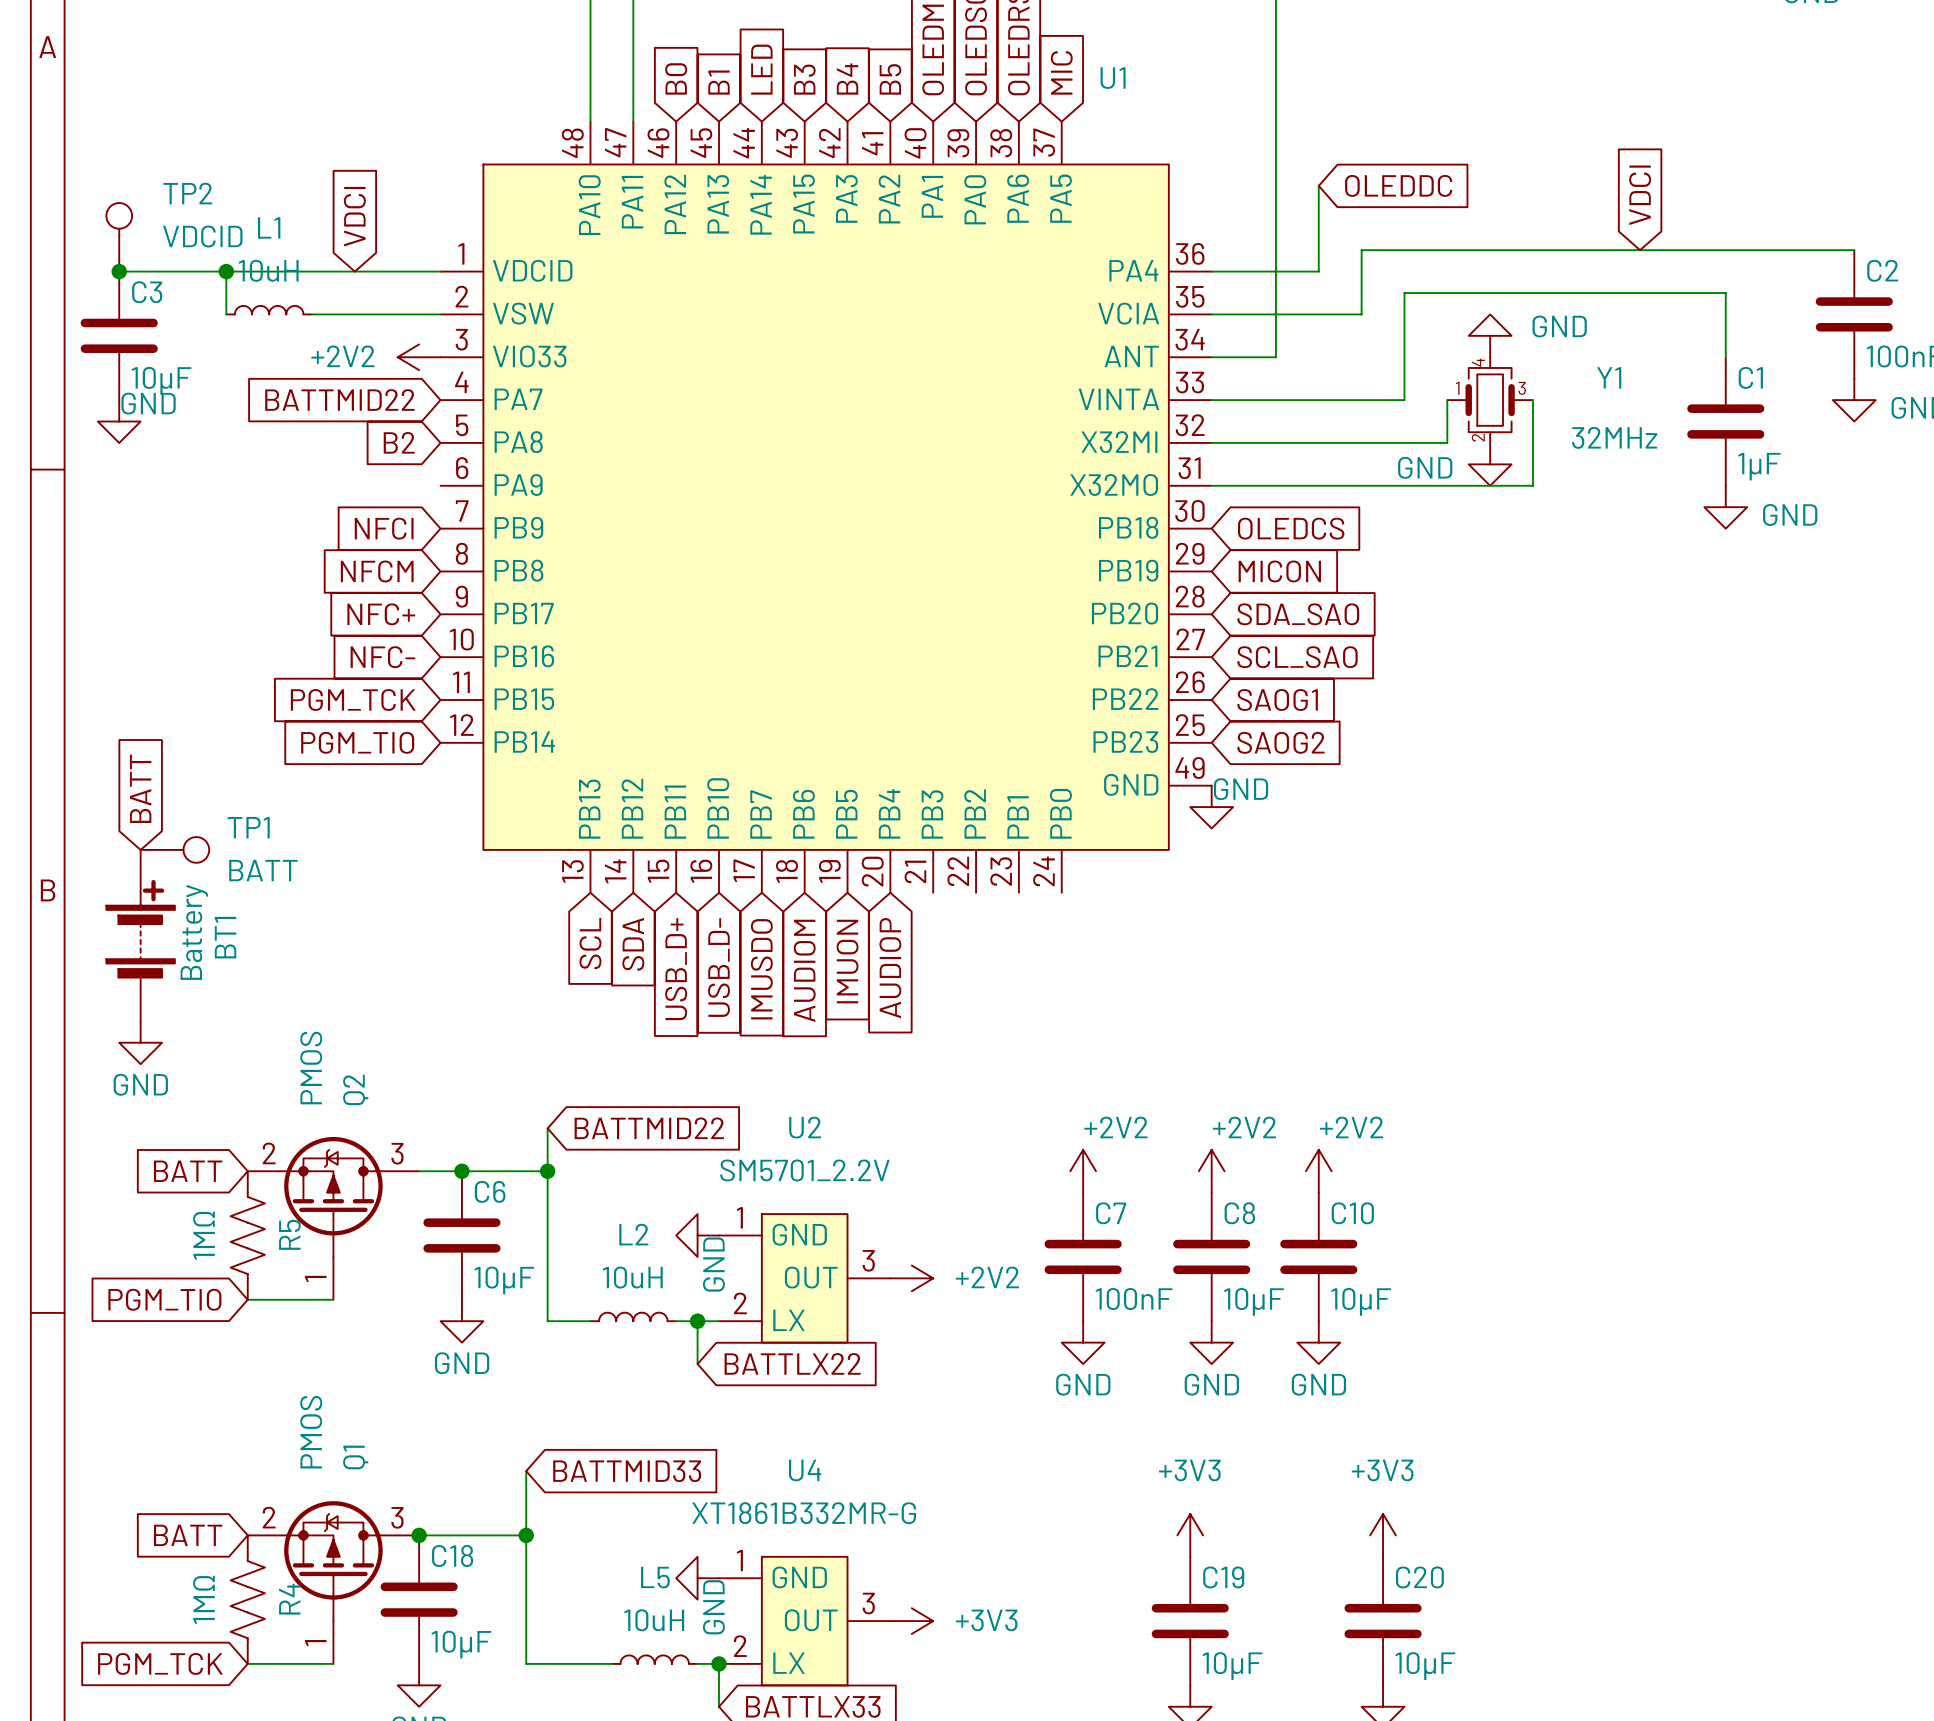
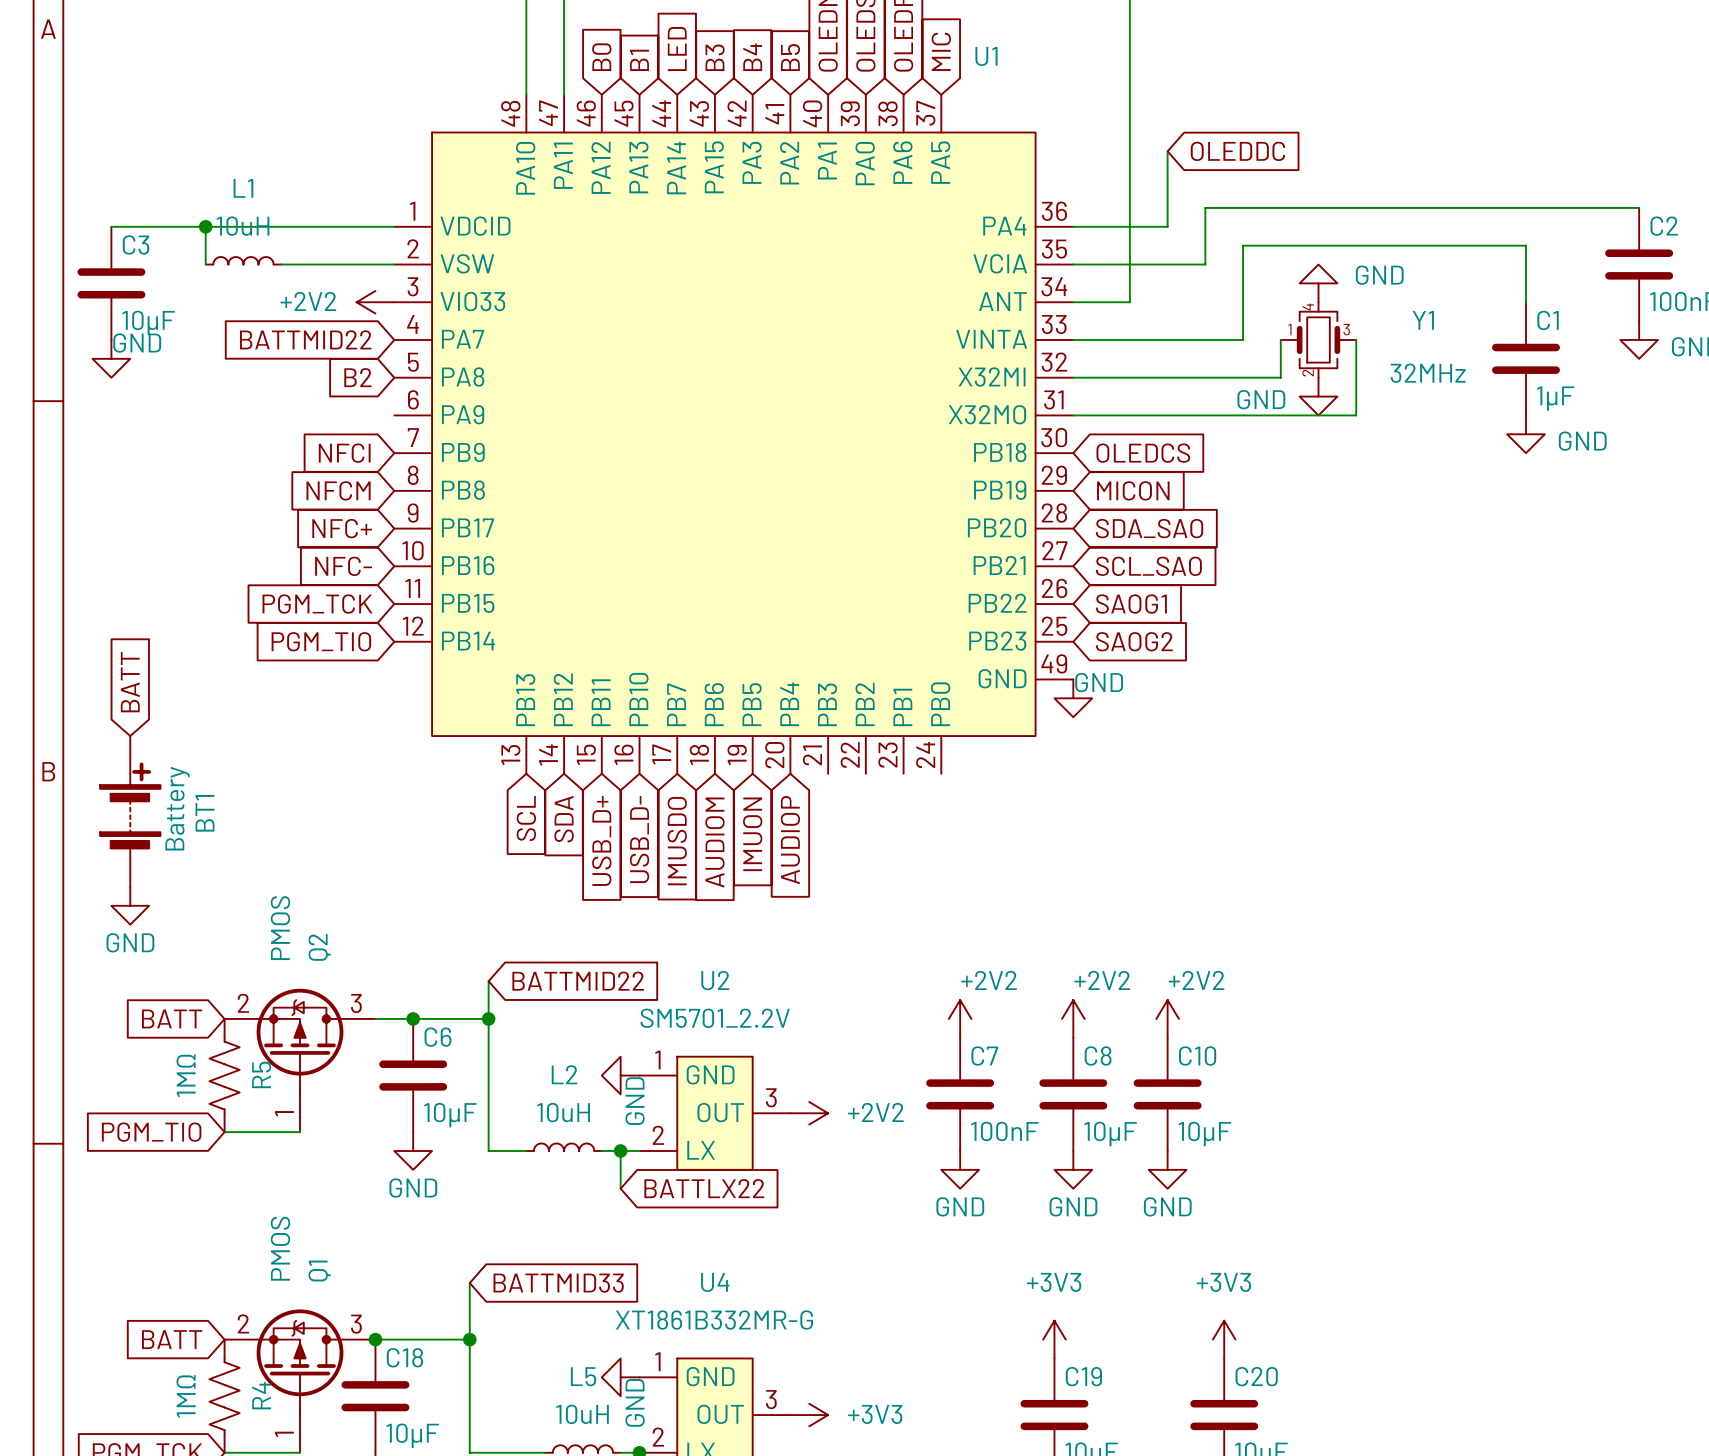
global label: VDCI (1640, 195) -> none
global label: VDCI (354, 216) -> none
TP2: VDCID (119, 237) -> none
junction: (119, 271) -> none
TP1: BATT (174, 849) -> none

